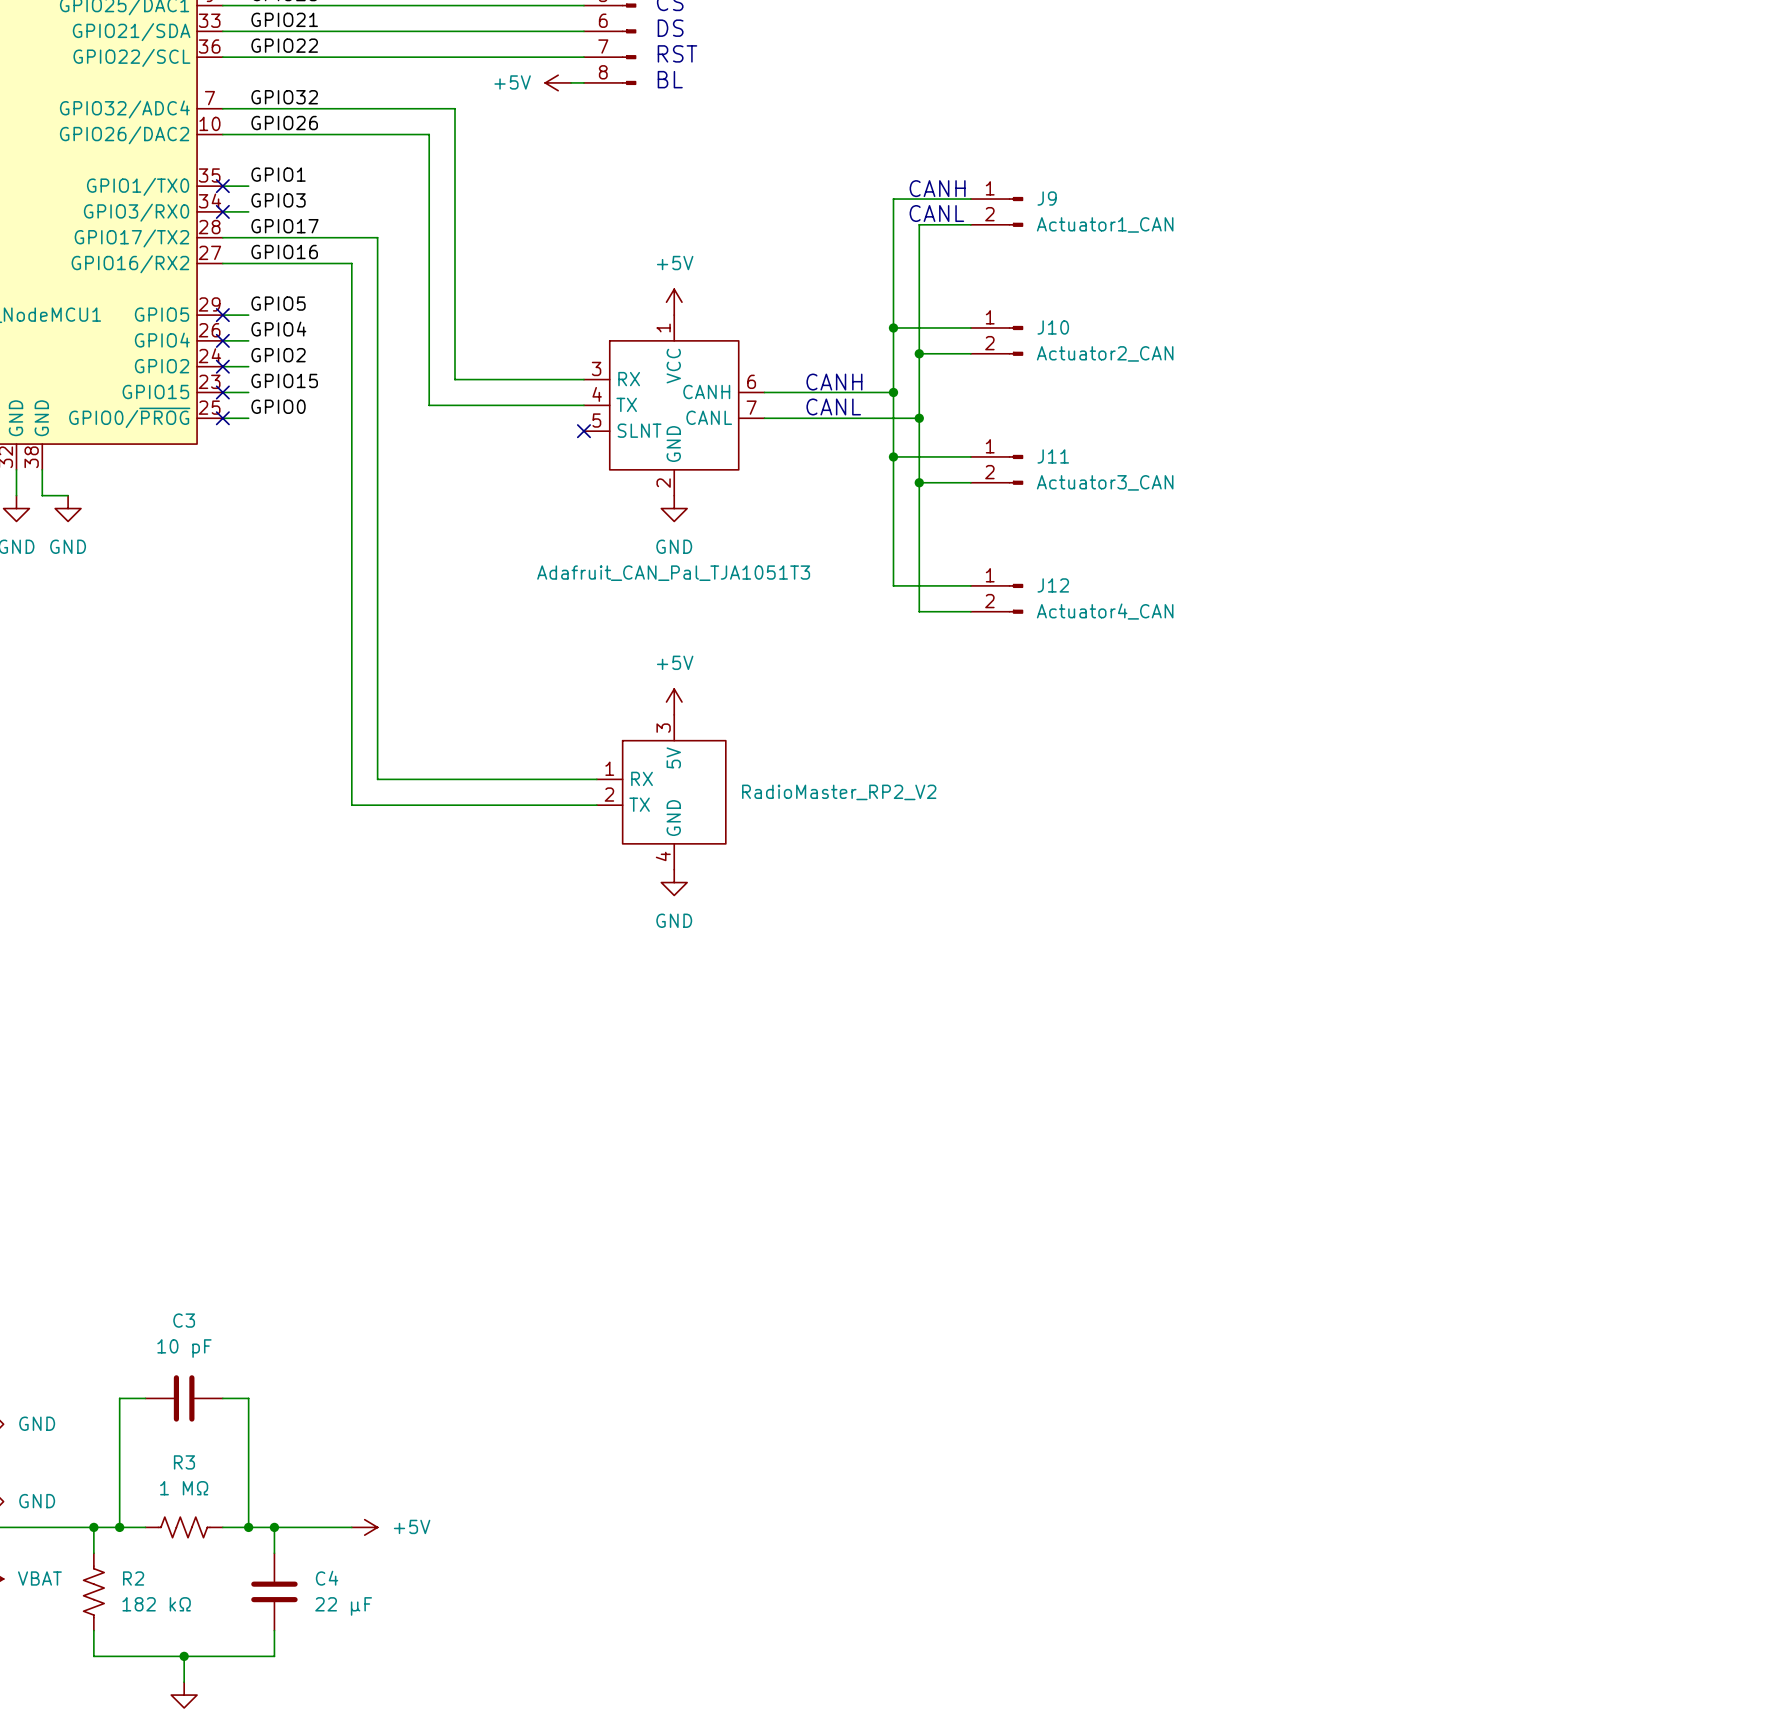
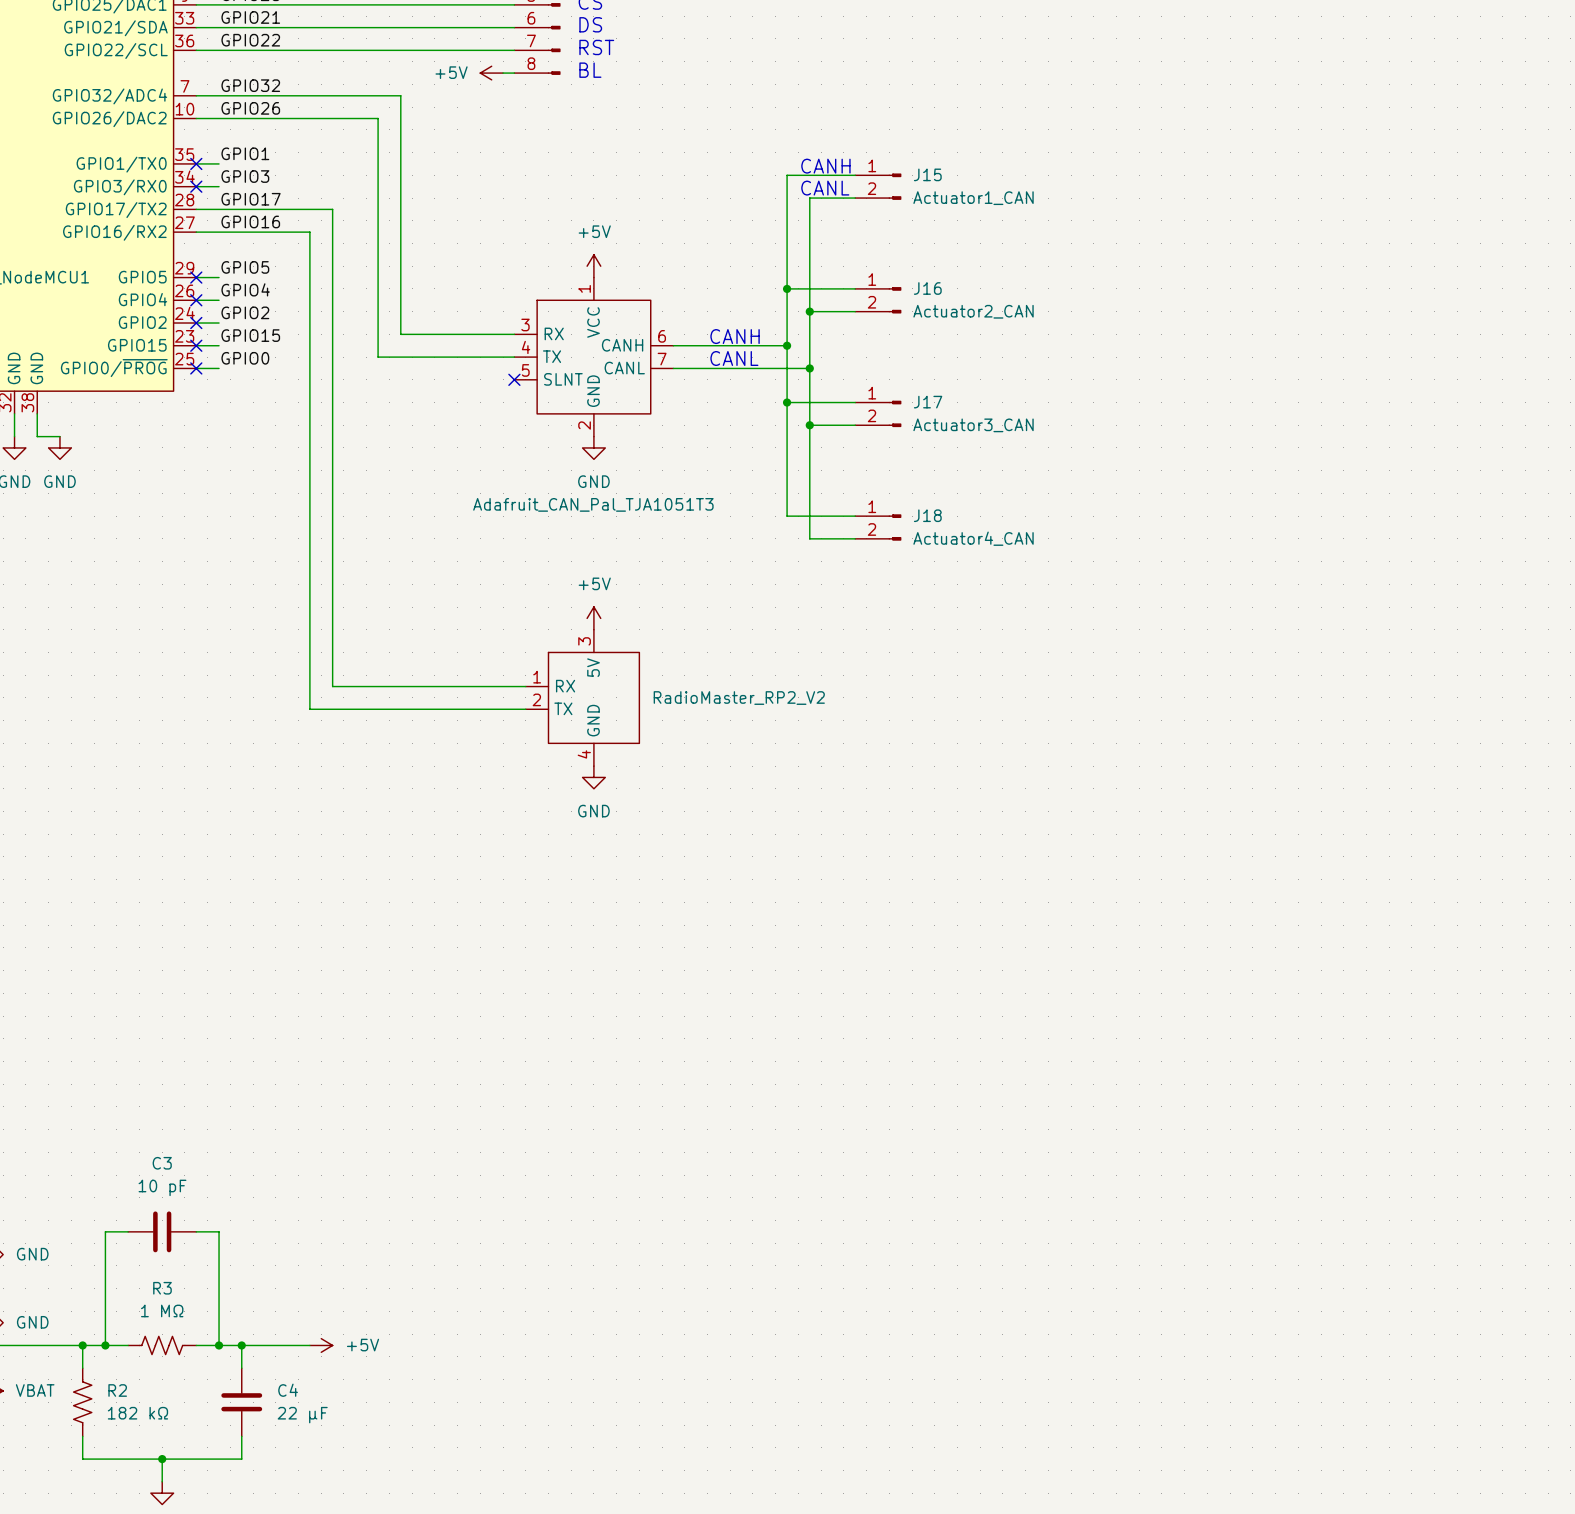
J9 name: J9 (1047, 198) -> J15 (927, 174)
J10 name: J10 (1053, 327) -> J16 (927, 288)
J11 name: J11 (1053, 456) -> J17 (928, 402)
J12 name: J12 (1053, 585) -> J18 (927, 515)

